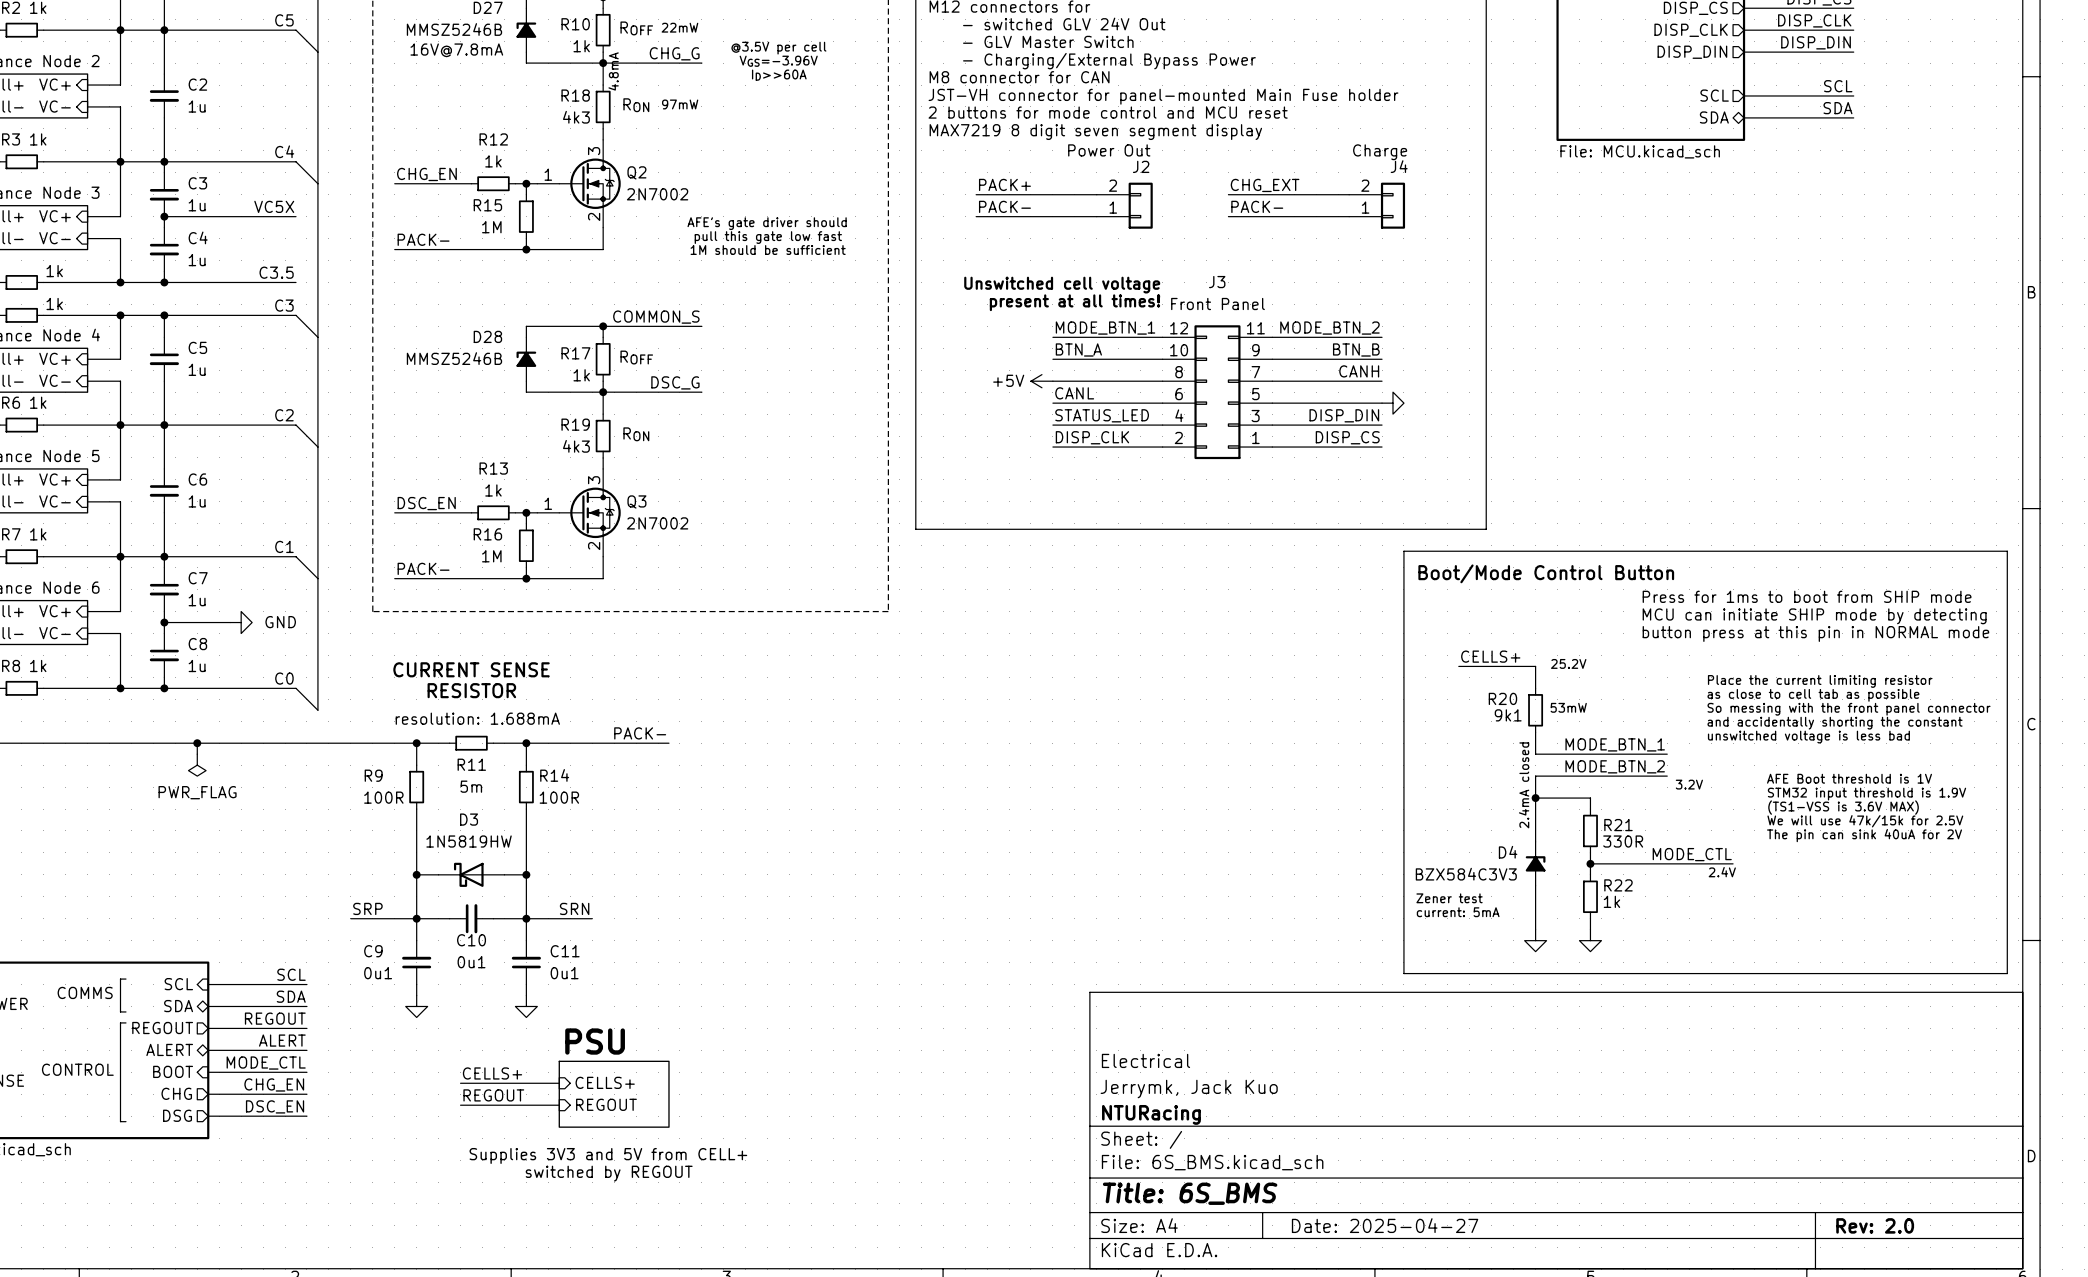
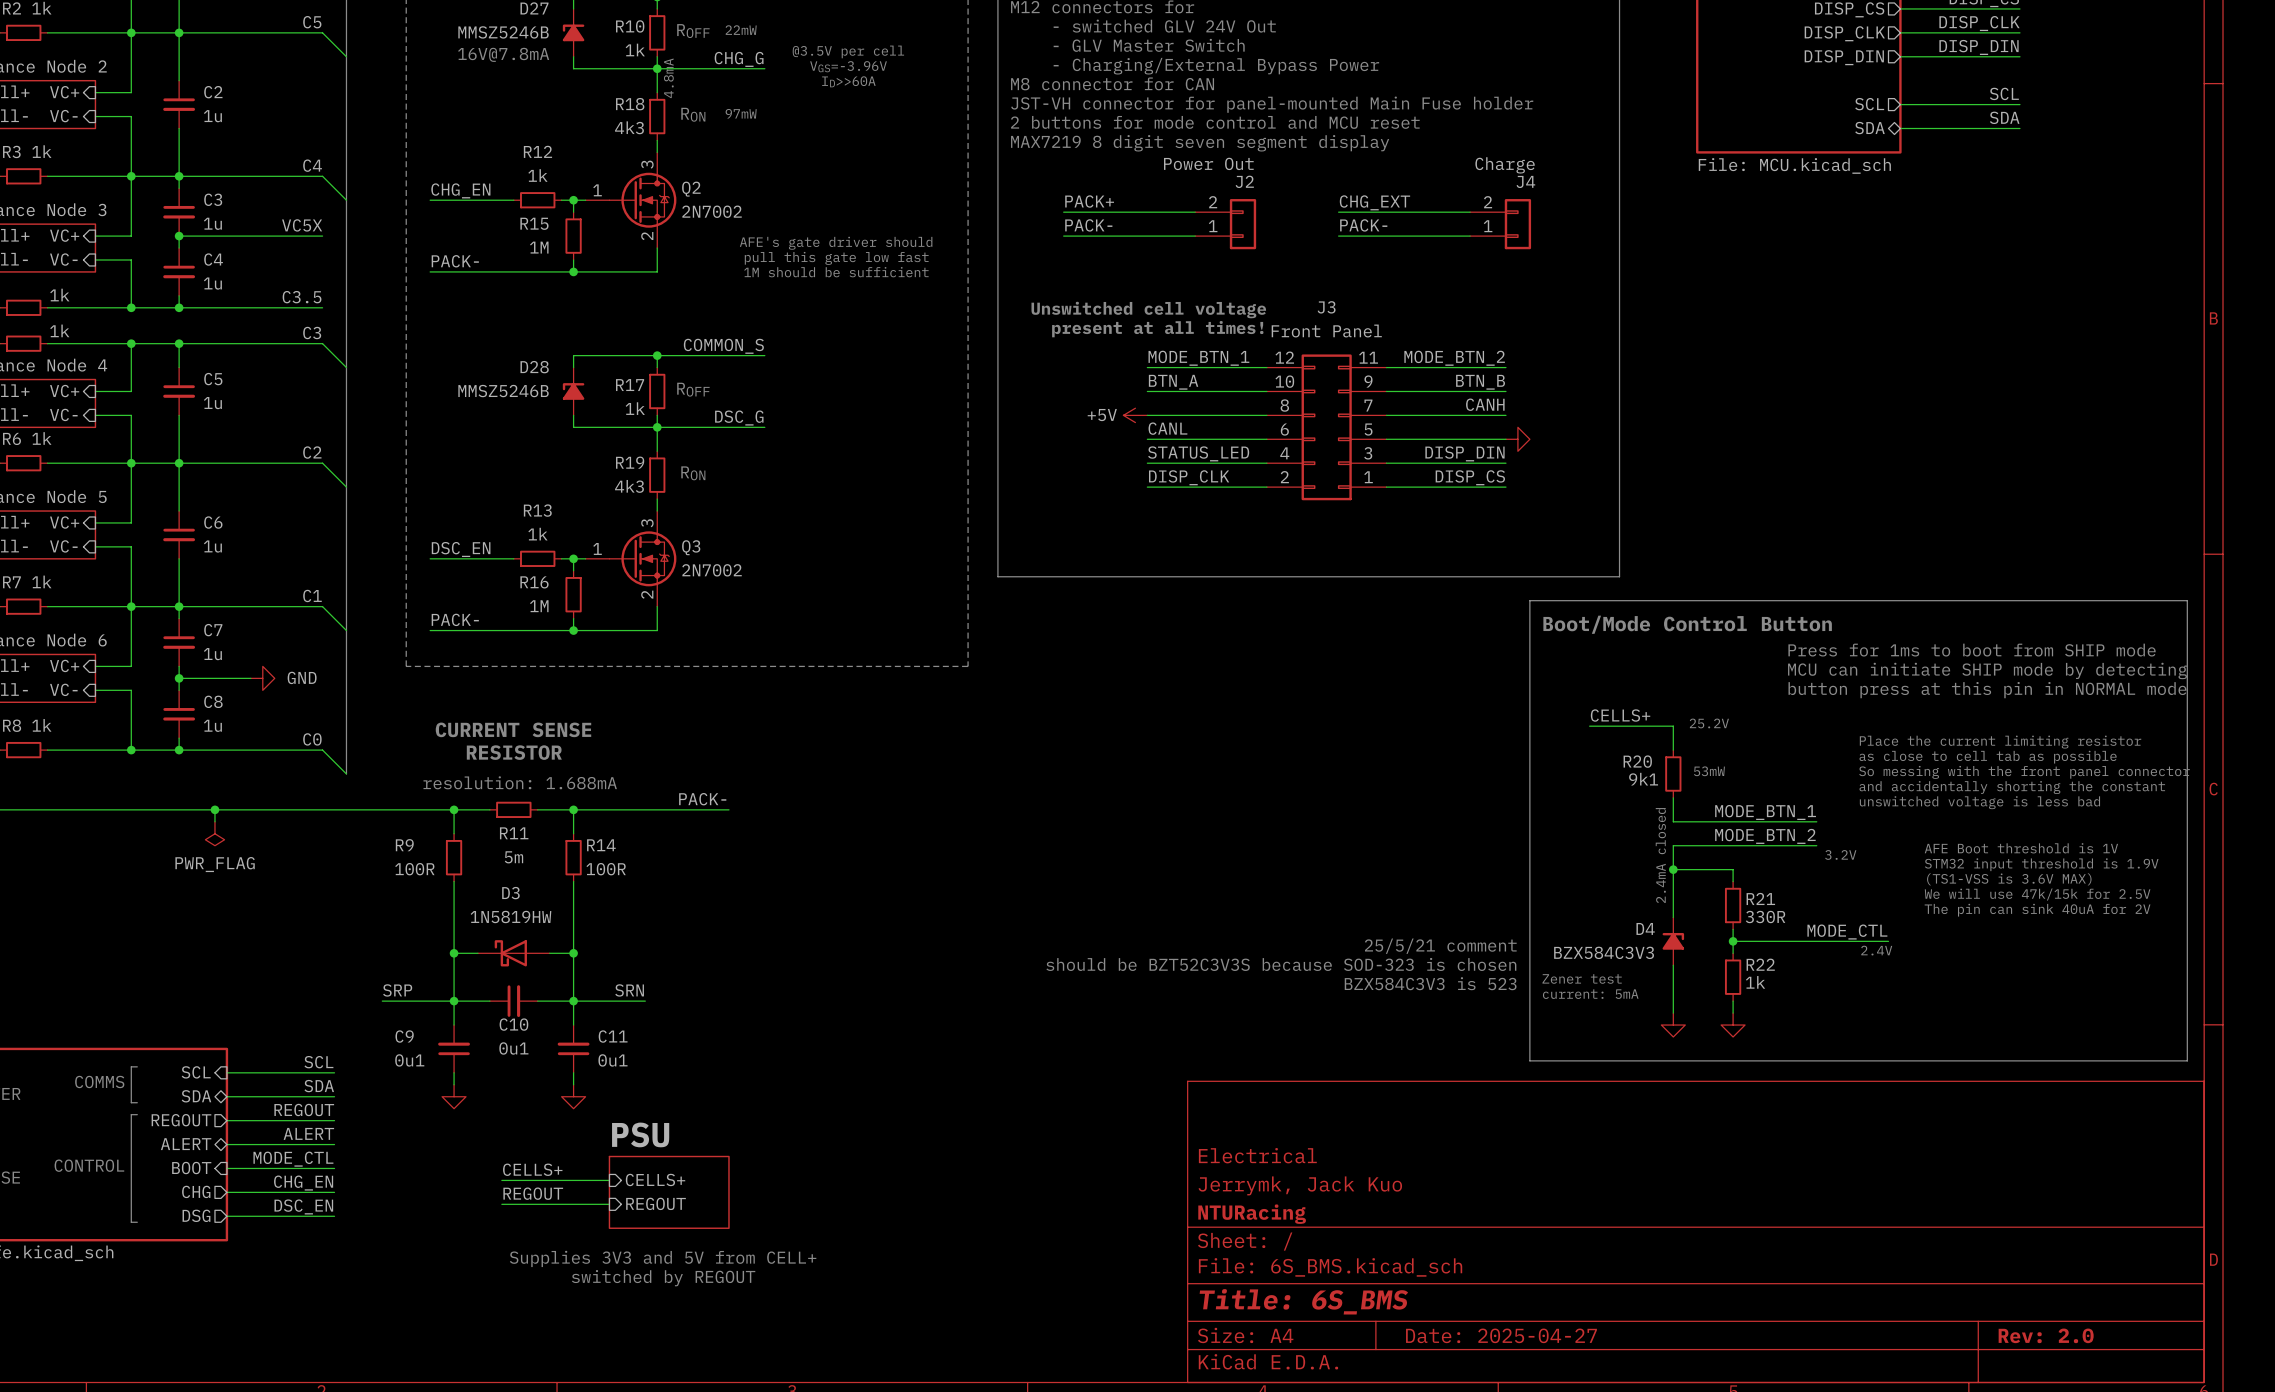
text: none -> 25/5/21 comment (1440, 946)
text: none -> should be BZT52C3V3S because SOD-323 is chosen (1281, 964)
text: none -> BZX584C3V3 is 523 (1430, 983)

